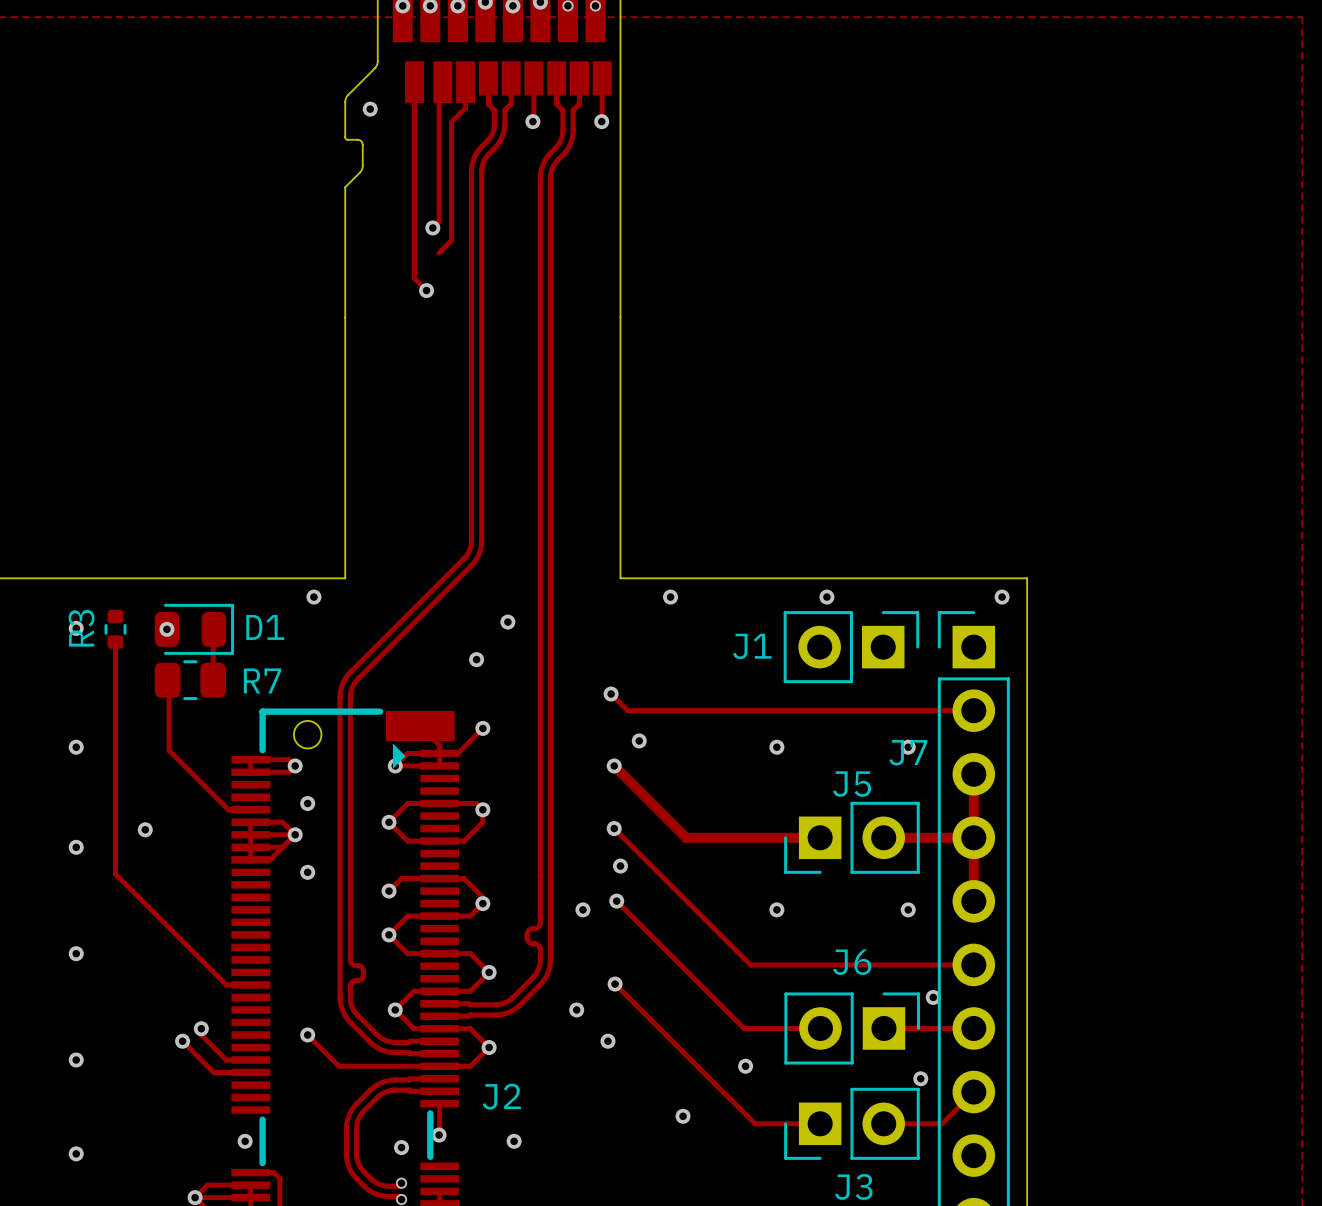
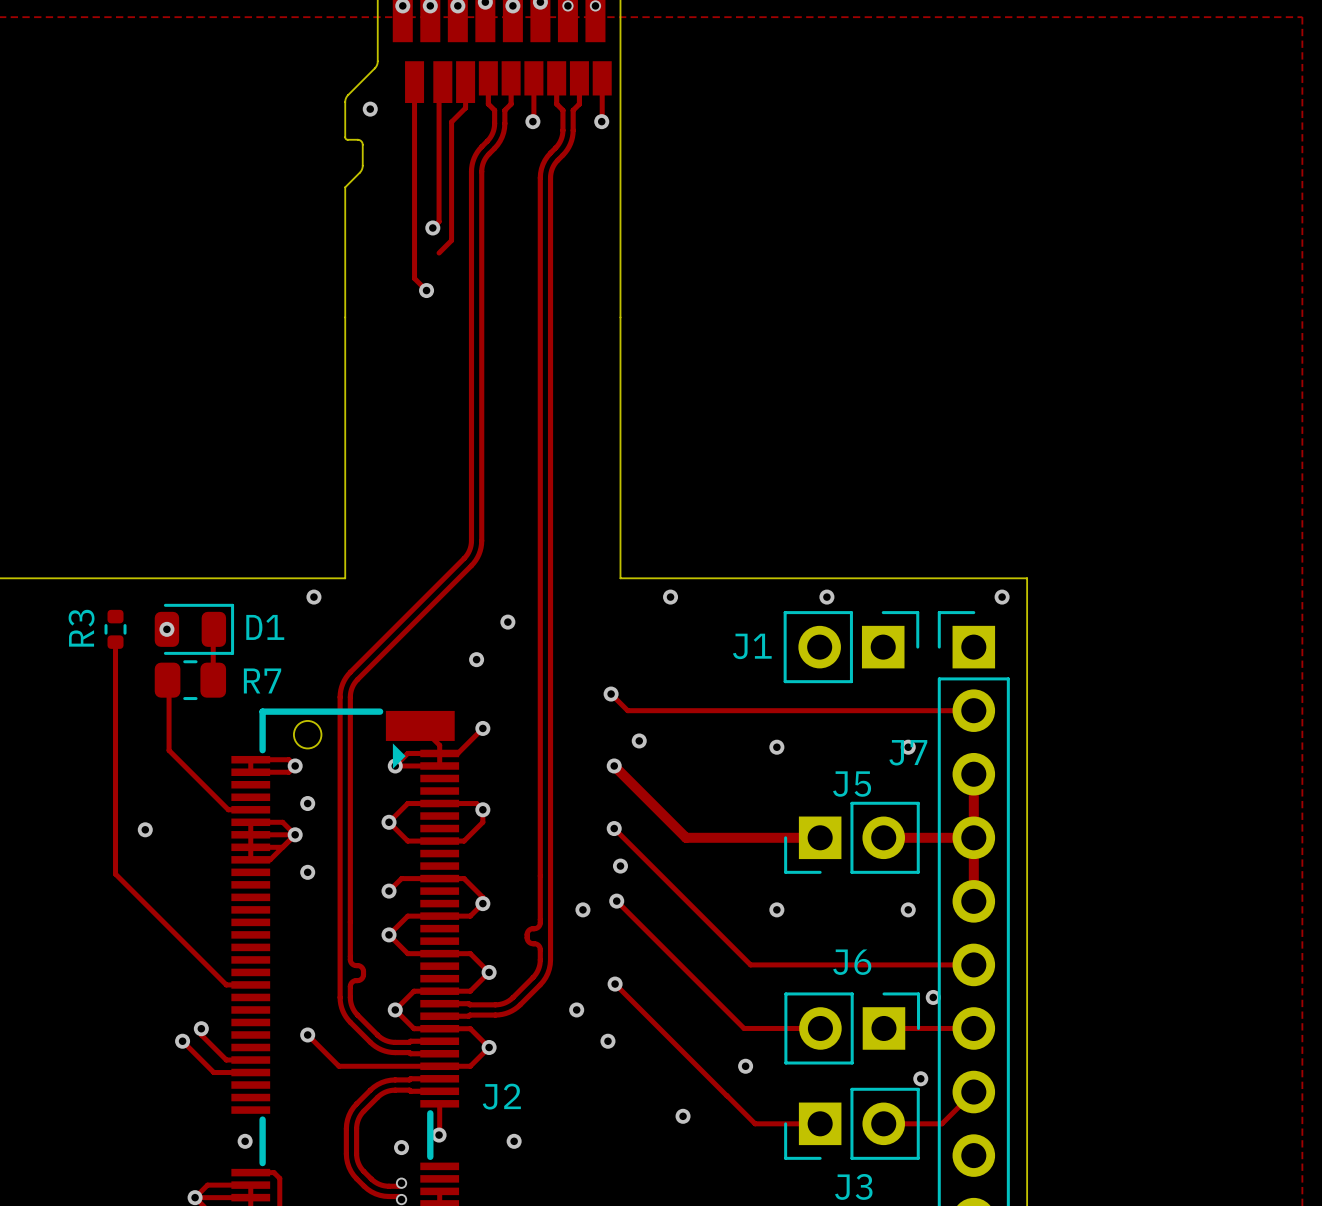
via: (76, 628) -> none
via: (76, 747) -> none
via: (76, 847) -> none
via: (76, 953) -> none
via: (76, 1060) -> none
via: (76, 1153) -> none

